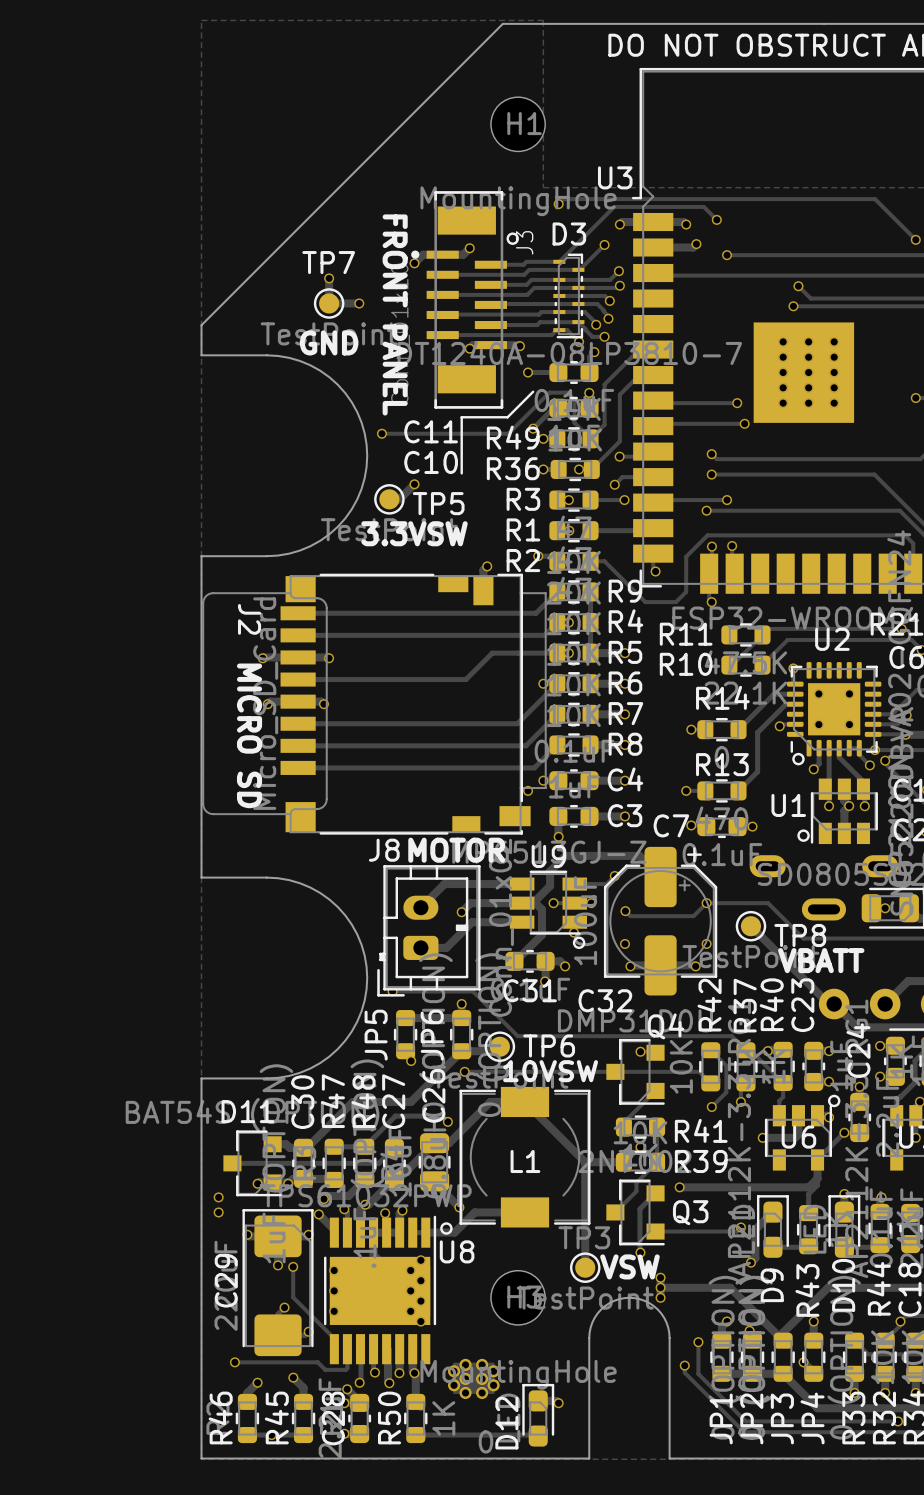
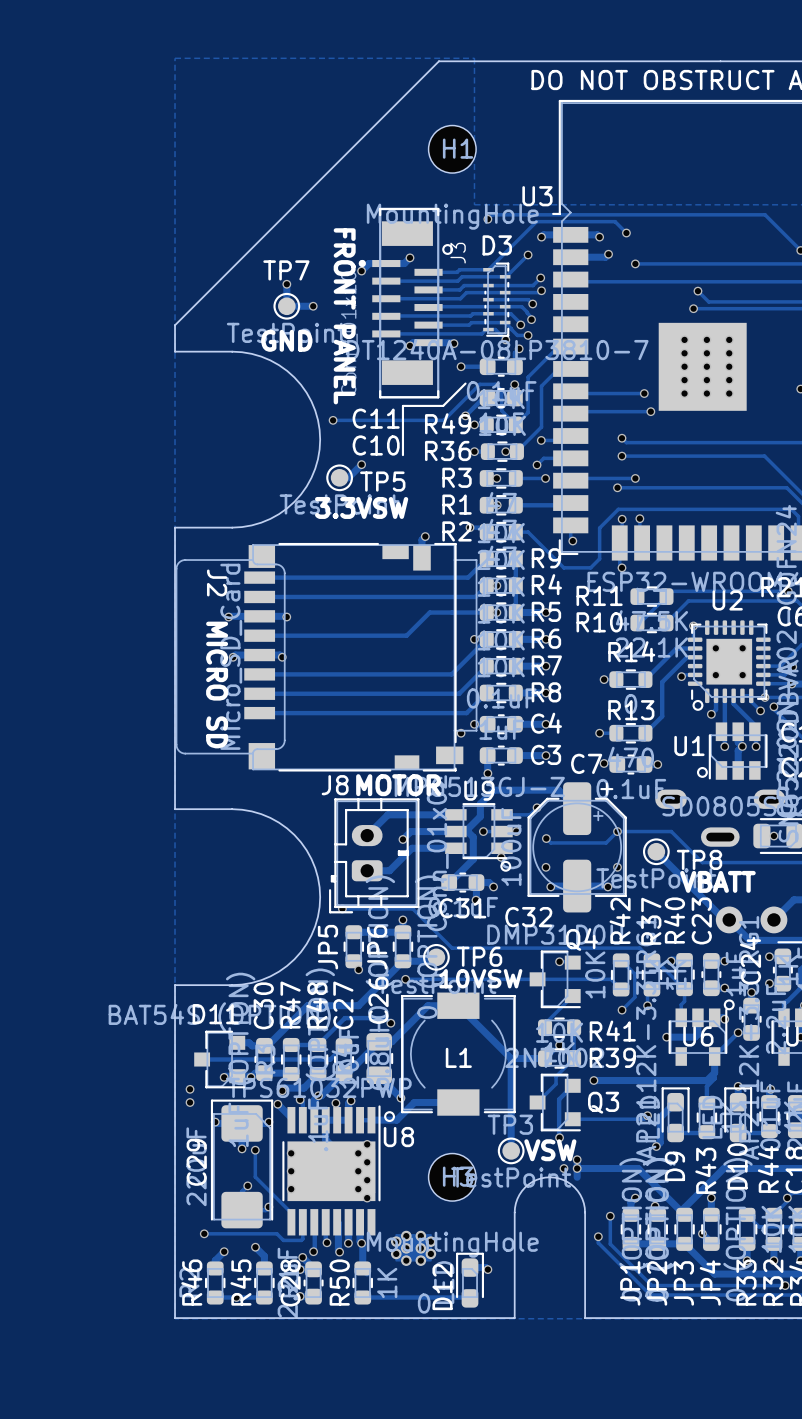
via position: (660, 1297) -> (563, 1168)

